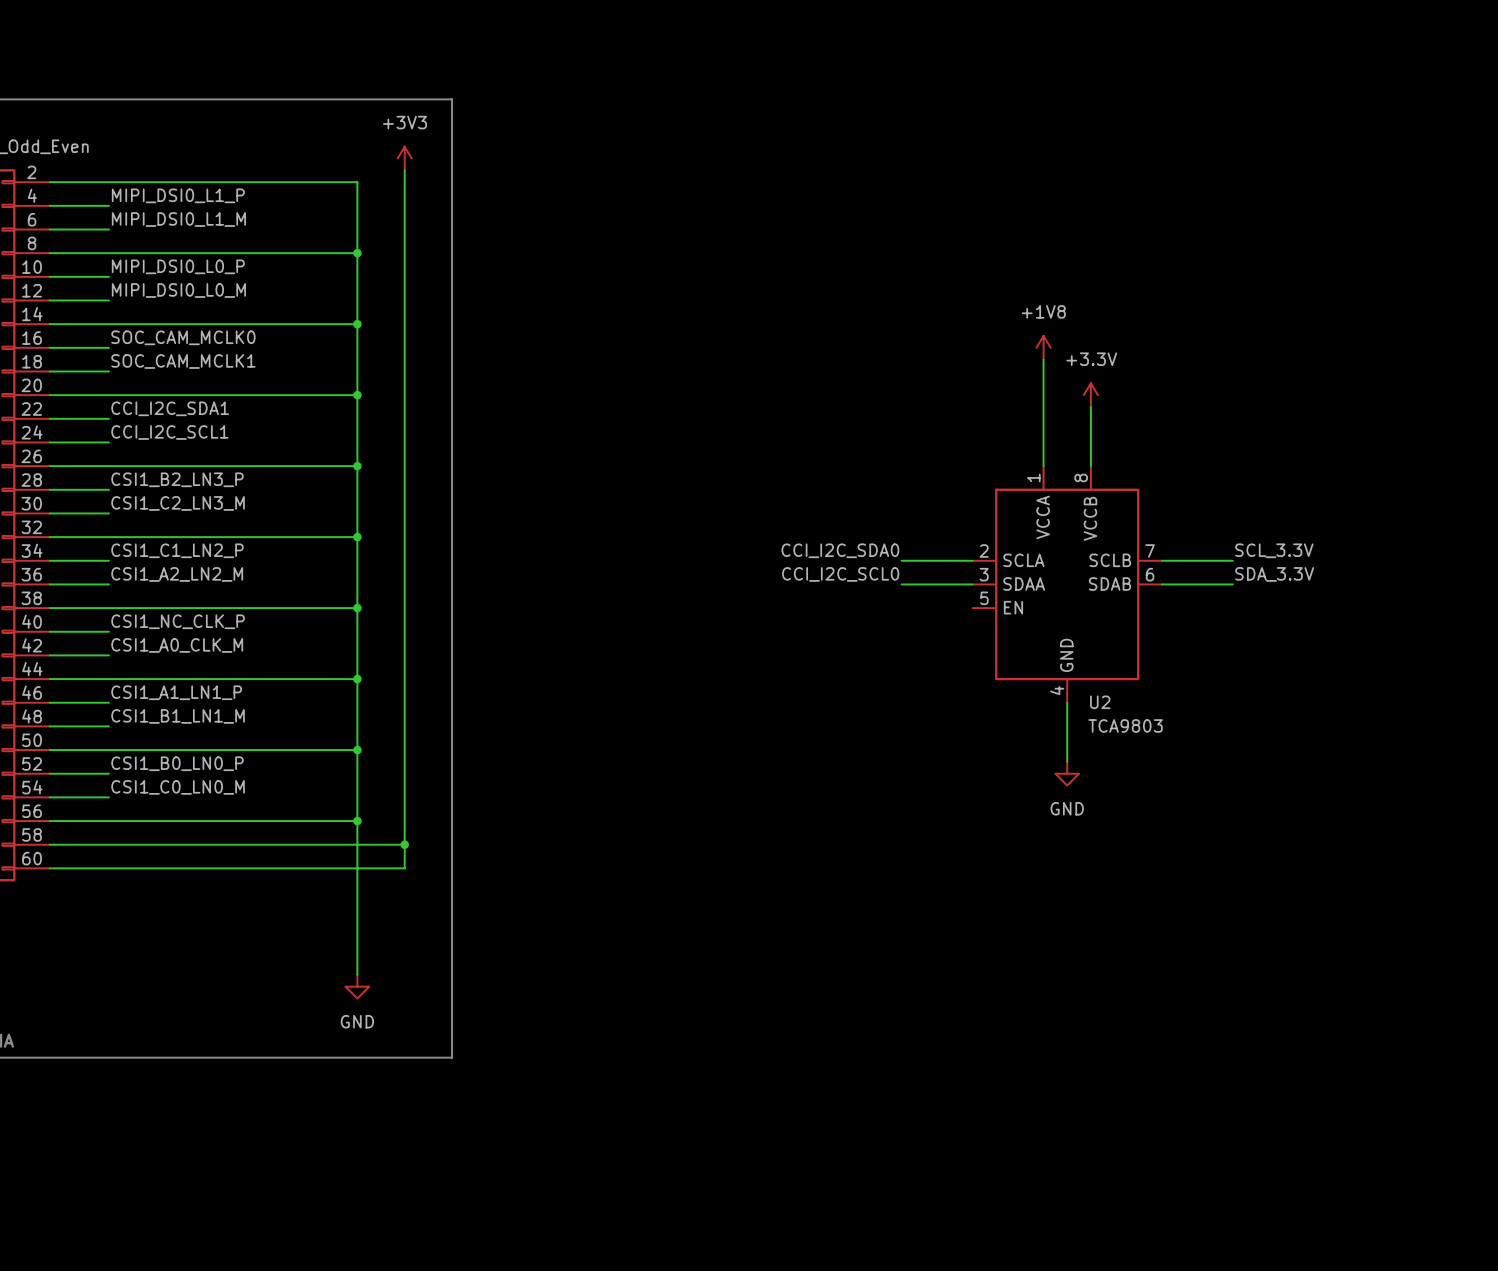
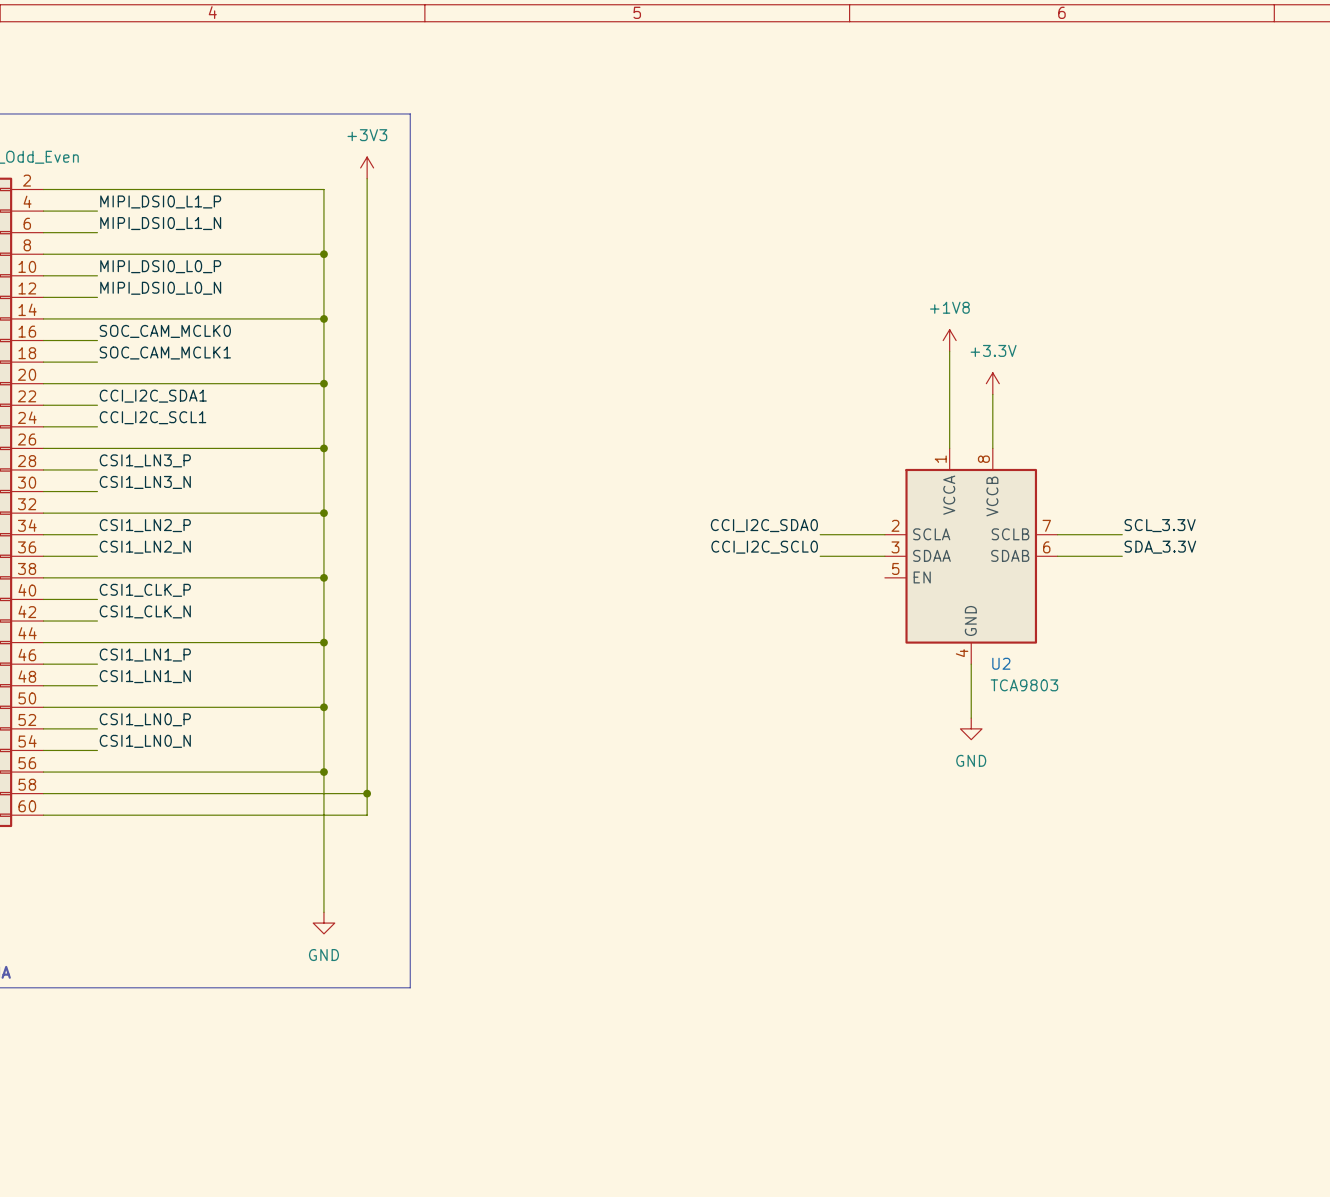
label: MIPI_DSI0_L1_M (178, 219) -> MIPI_DSI0_L1_N (160, 223)
label: MIPI_DSI0_L0_M (178, 290) -> MIPI_DSI0_L0_N (160, 288)
label: CSI1_B2_LN3_P (177, 479) -> CSI1_LN3_P (145, 460)
label: CSI1_C2_LN3_M (178, 503) -> CSI1_LN3_N (145, 482)
label: CSI1_C1_LN2_P (177, 550) -> CSI1_LN2_P (145, 525)
label: CSI1_A2_LN2_M (177, 574) -> CSI1_LN2_N (145, 547)
label: CSI1_NC_CLK_P (178, 621) -> CSI1_CLK_P (145, 590)
label: CSI1_A0_CLK_M (177, 645) -> CSI1_CLK_N (145, 611)
label: CSI1_A1_LN1_P (176, 692) -> CSI1_LN1_P (145, 655)
label: CSI1_B1_LN1_M (178, 716) -> CSI1_LN1_N (145, 676)
label: CSI1_B0_LN0_P (177, 763) -> CSI1_LN0_P (145, 719)
label: CSI1_C0_LN0_M (178, 787) -> CSI1_LN0_N (145, 741)

